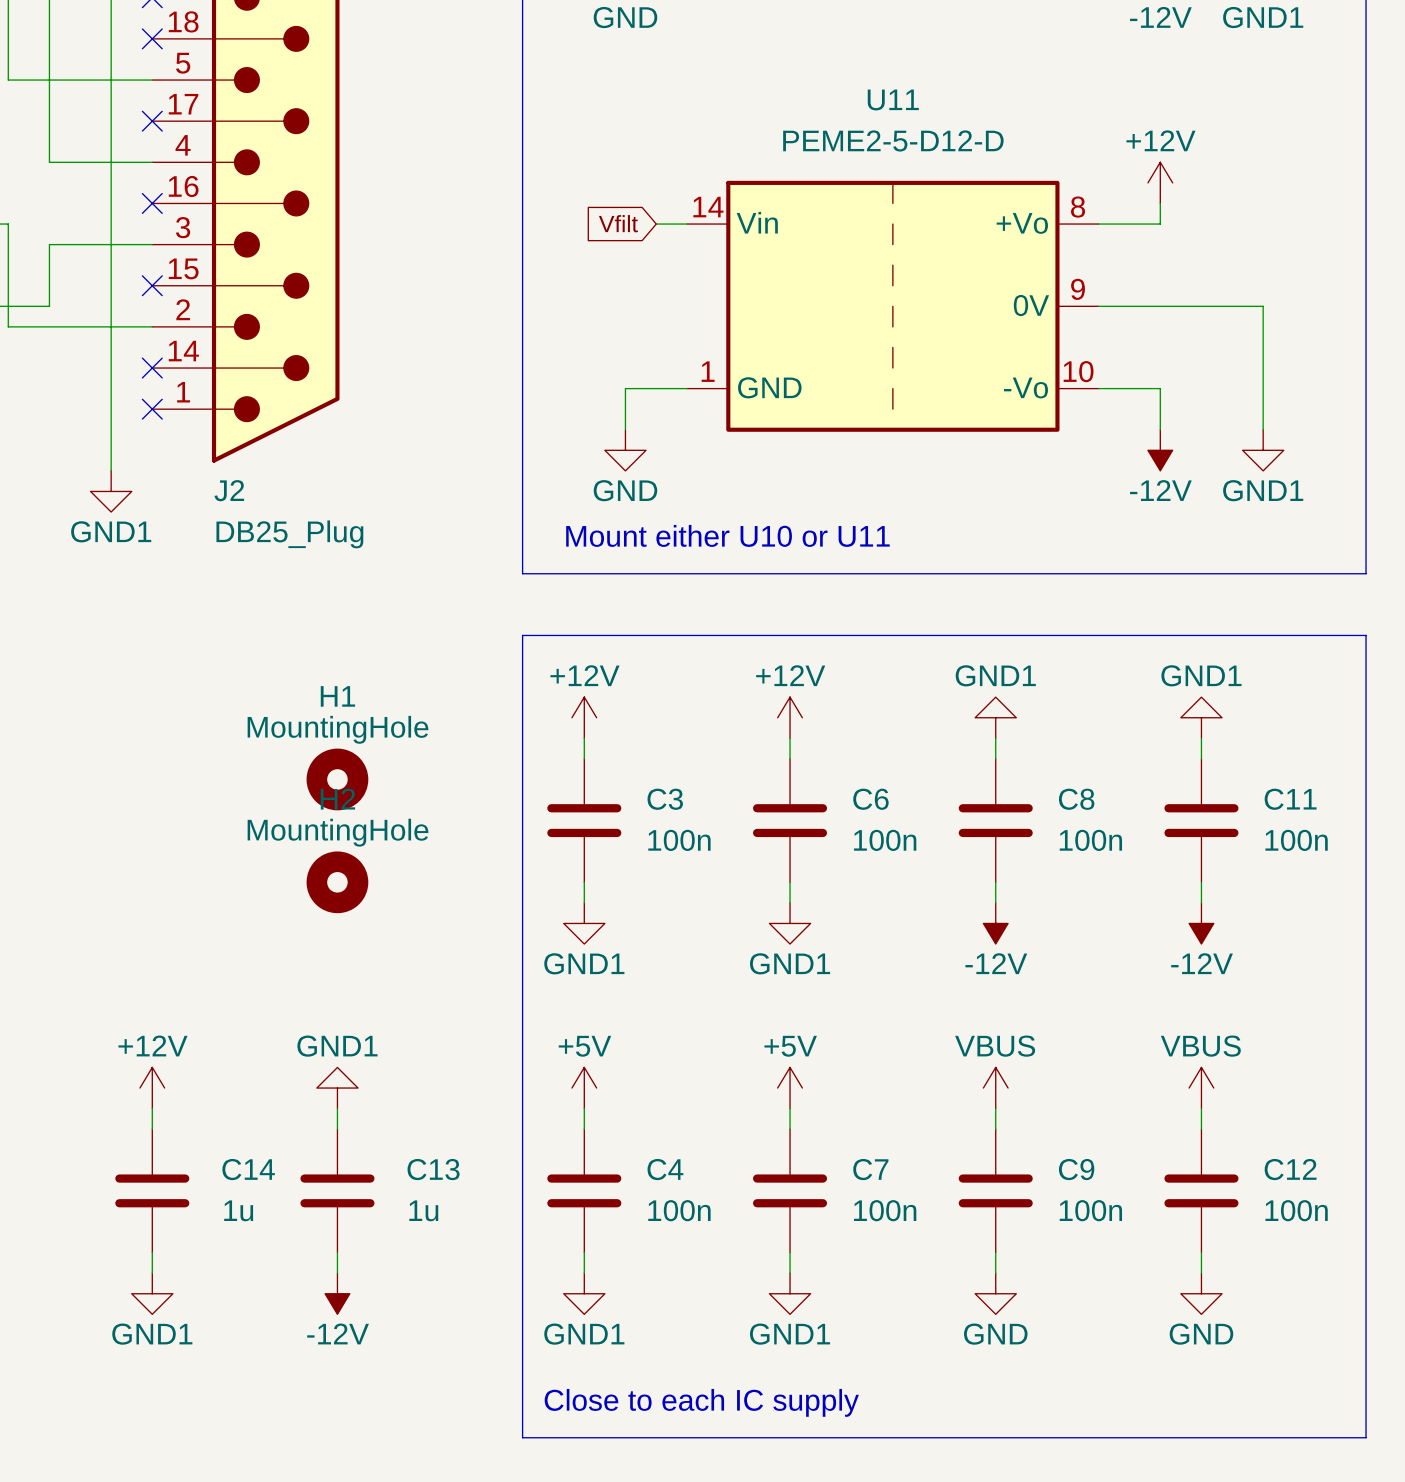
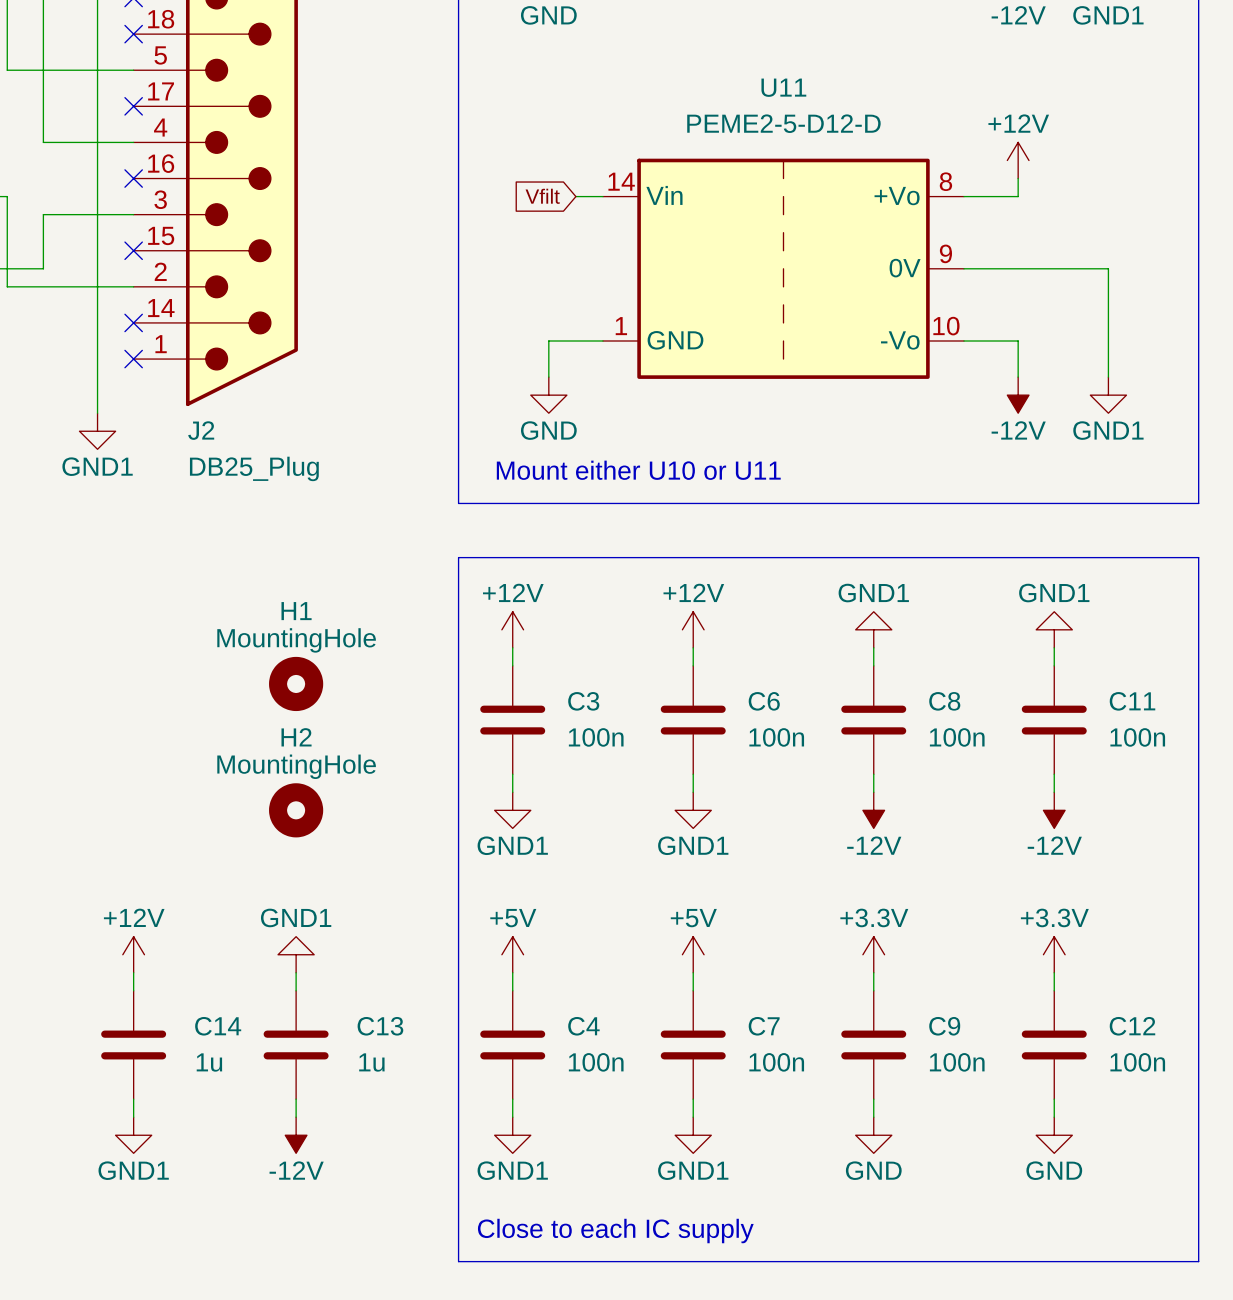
H2 position: (337, 882) -> (296, 810)
power symbol: VBUS (995, 1088) -> +3.3V (873, 954)
power symbol: VBUS (1201, 1088) -> +3.3V (1054, 954)

